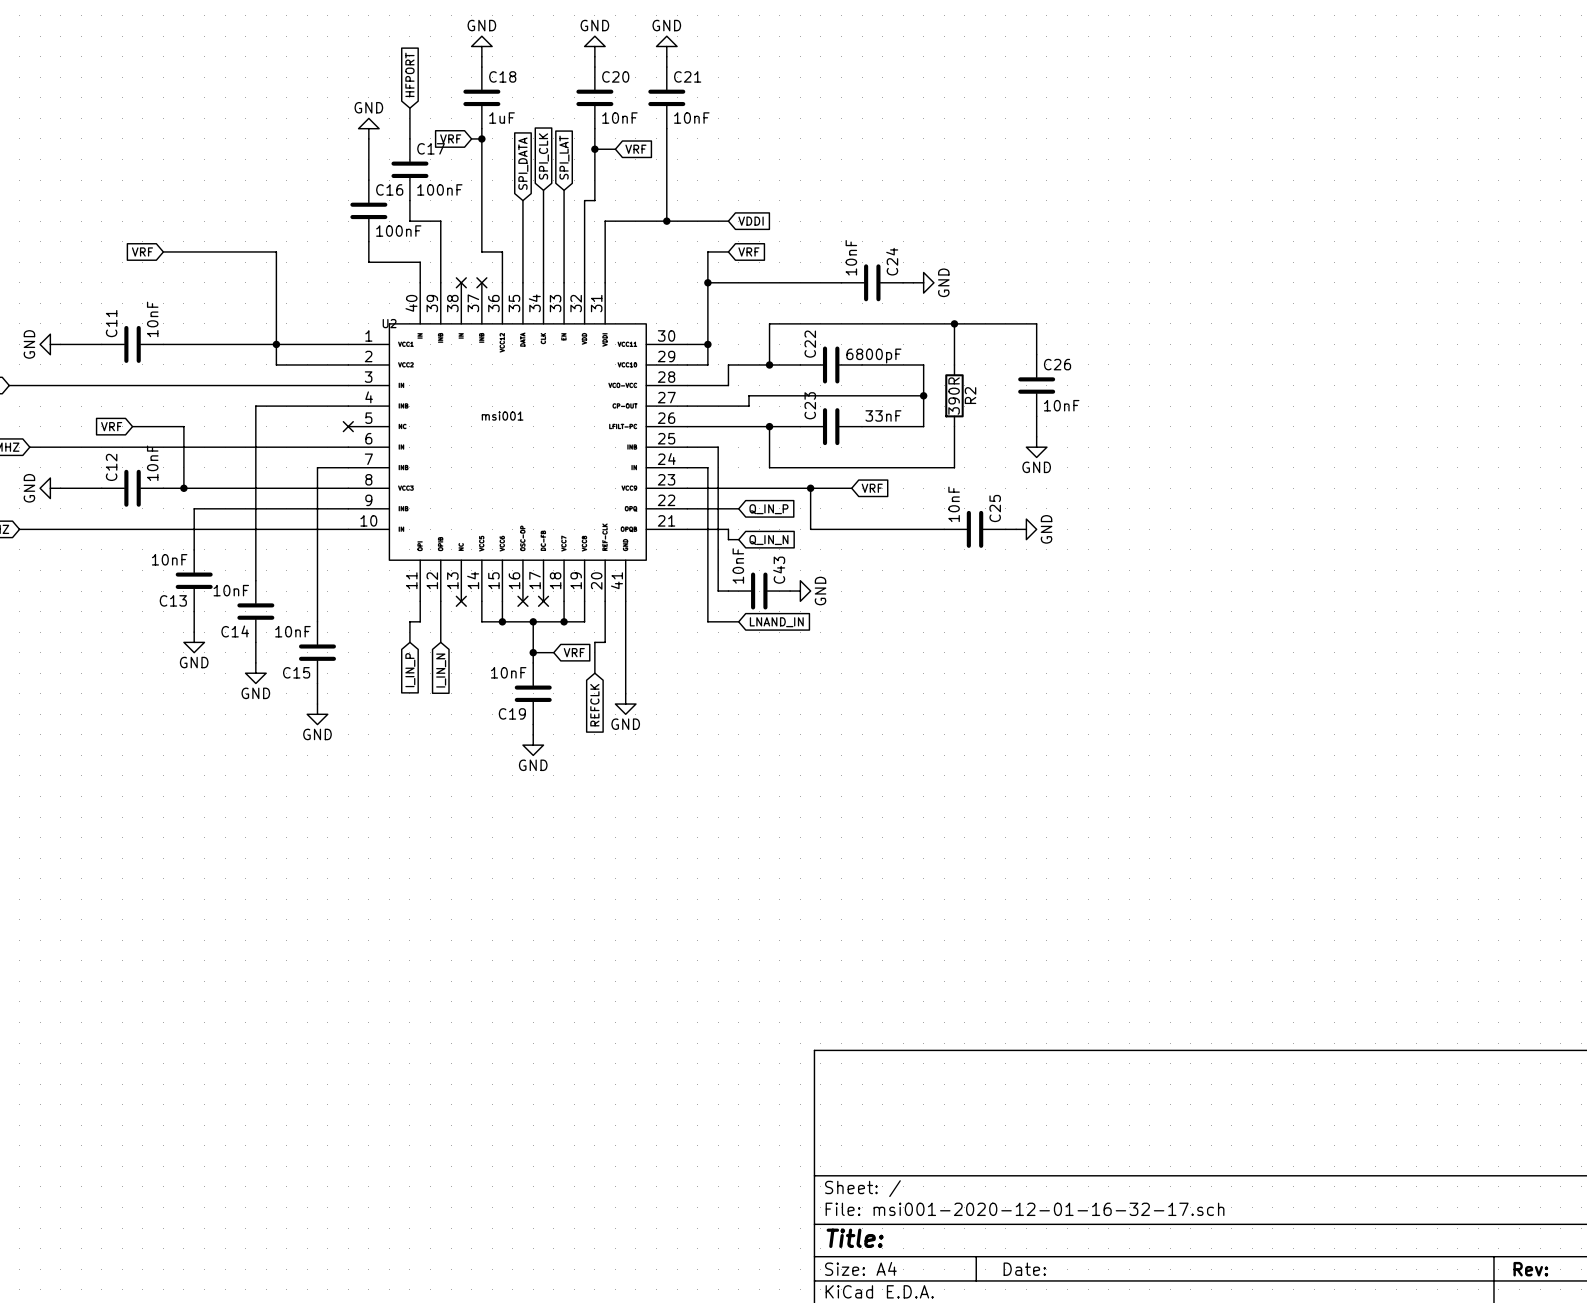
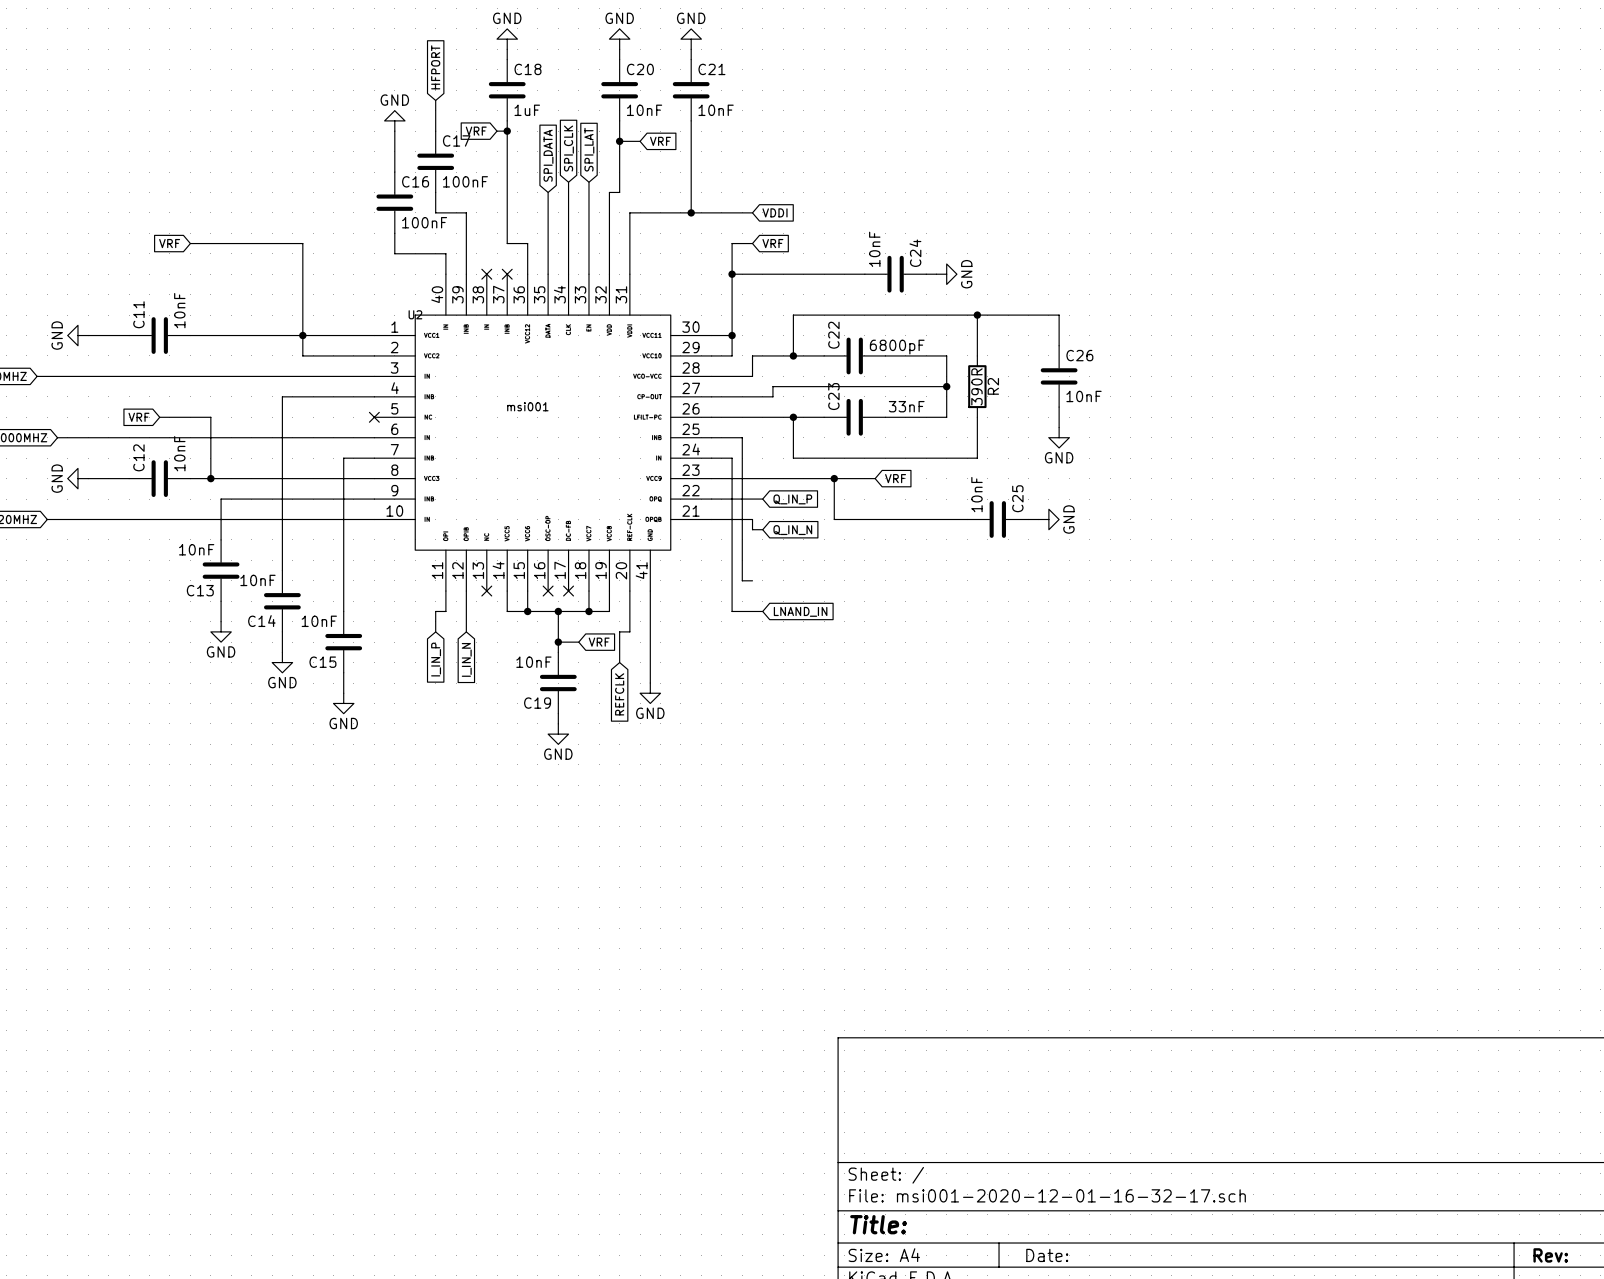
C43: 10nF (759, 591) -> none
power symbol: GND (800, 591) -> none

